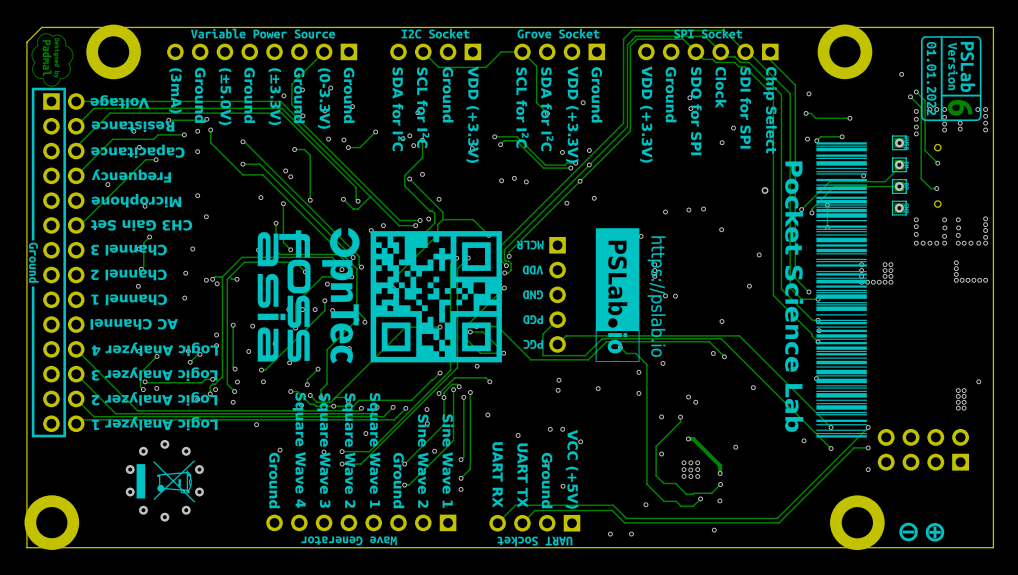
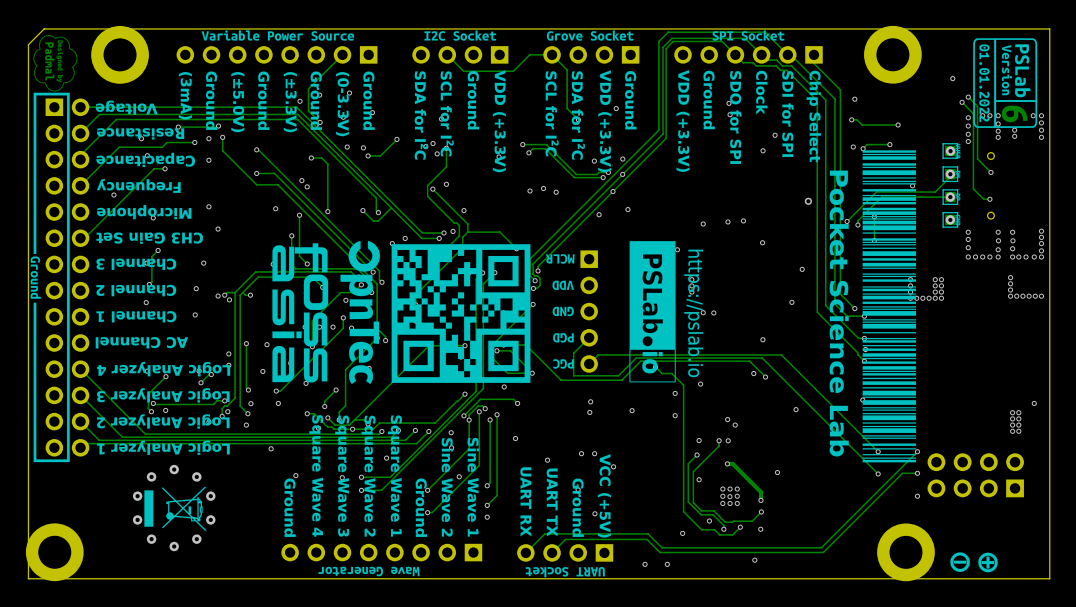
via: none -> (728, 440)
track: none -> (697, 455) (688, 463) (688, 501) (701, 514) (713, 514) (723, 525) (723, 529)
via: none -> (697, 455)
via: (804, 440) -> none
via: none -> (709, 521)
via: none -> (723, 529)

